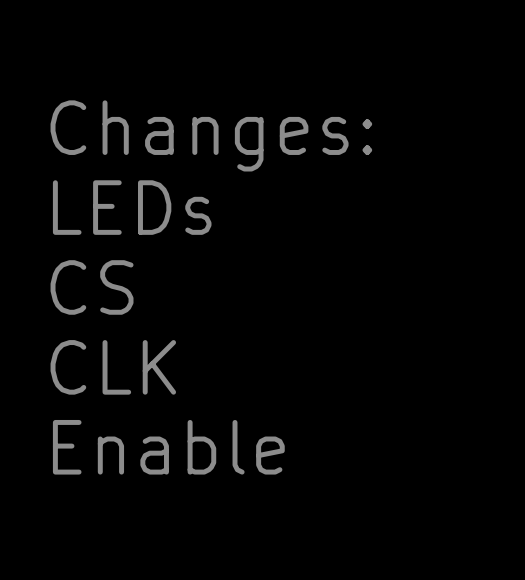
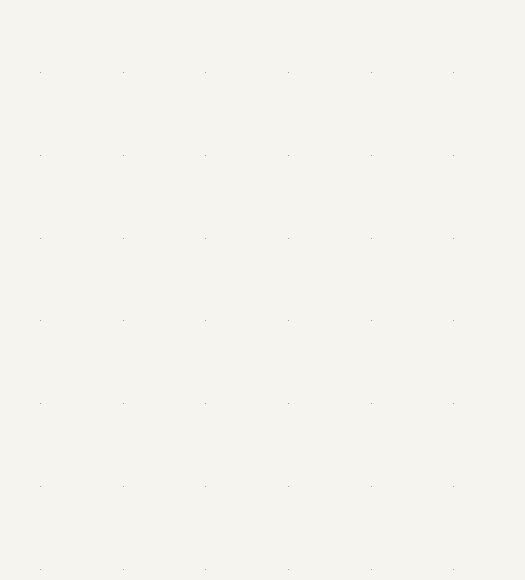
text: Changes: (211, 135) -> none
text: LEDs (132, 207) -> none
text: CS (92, 287) -> none
text: CLK (113, 367) -> none
text: Enable (168, 447) -> none

